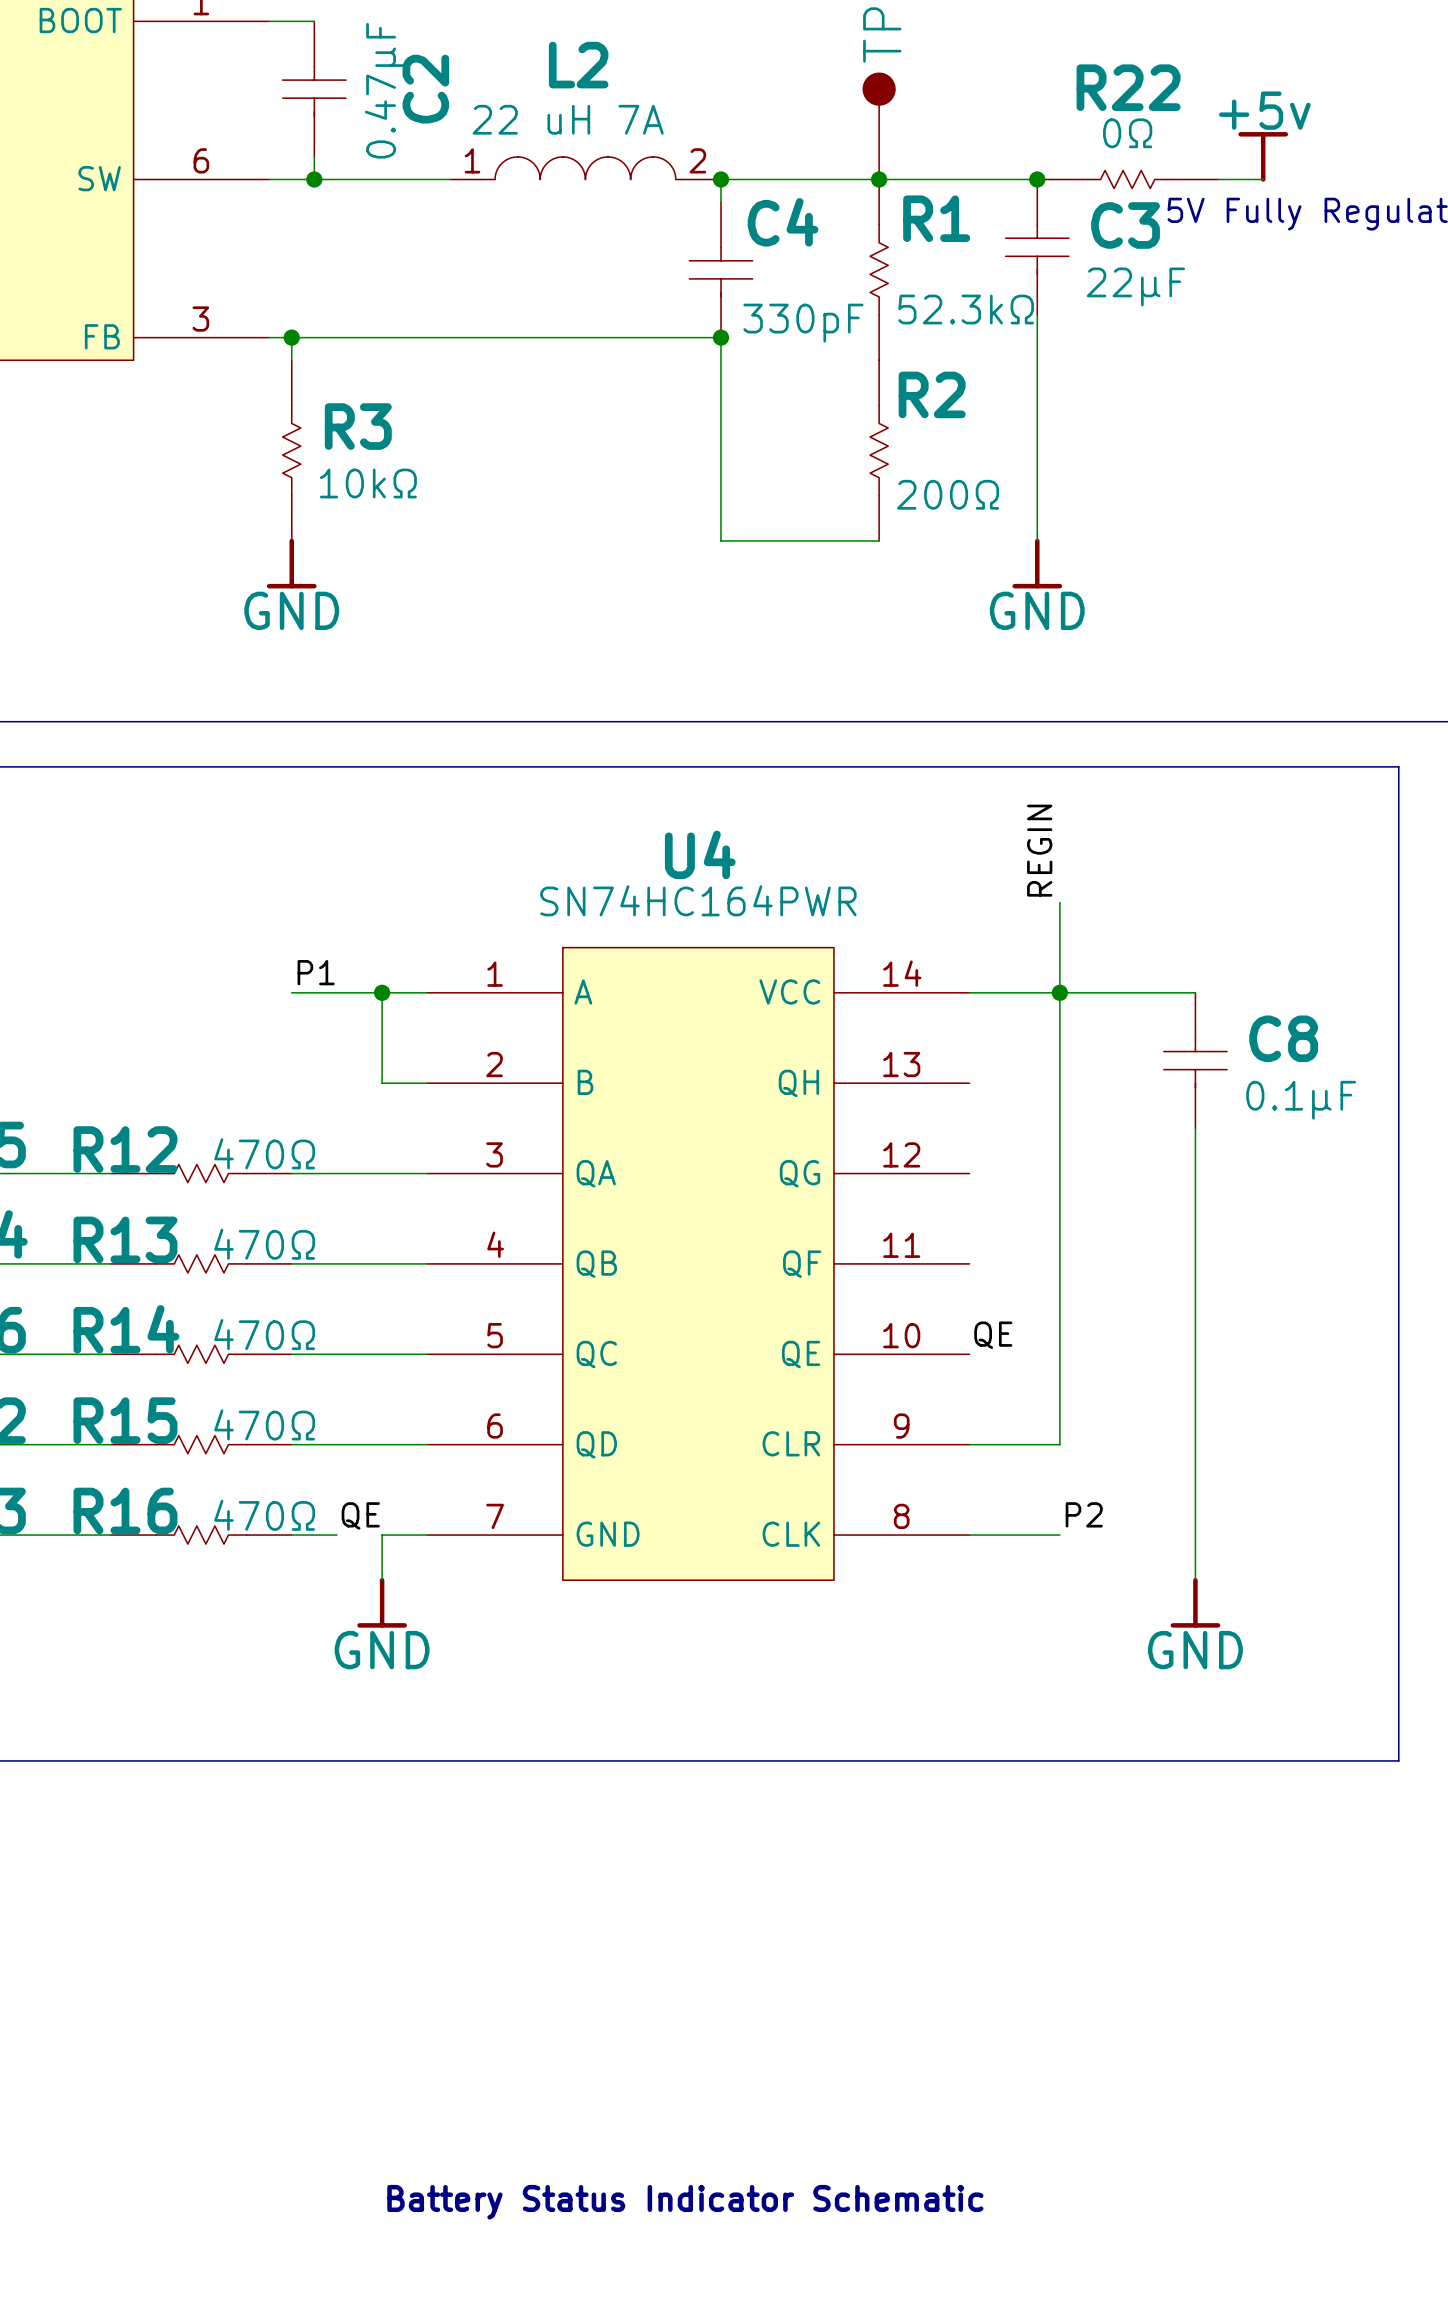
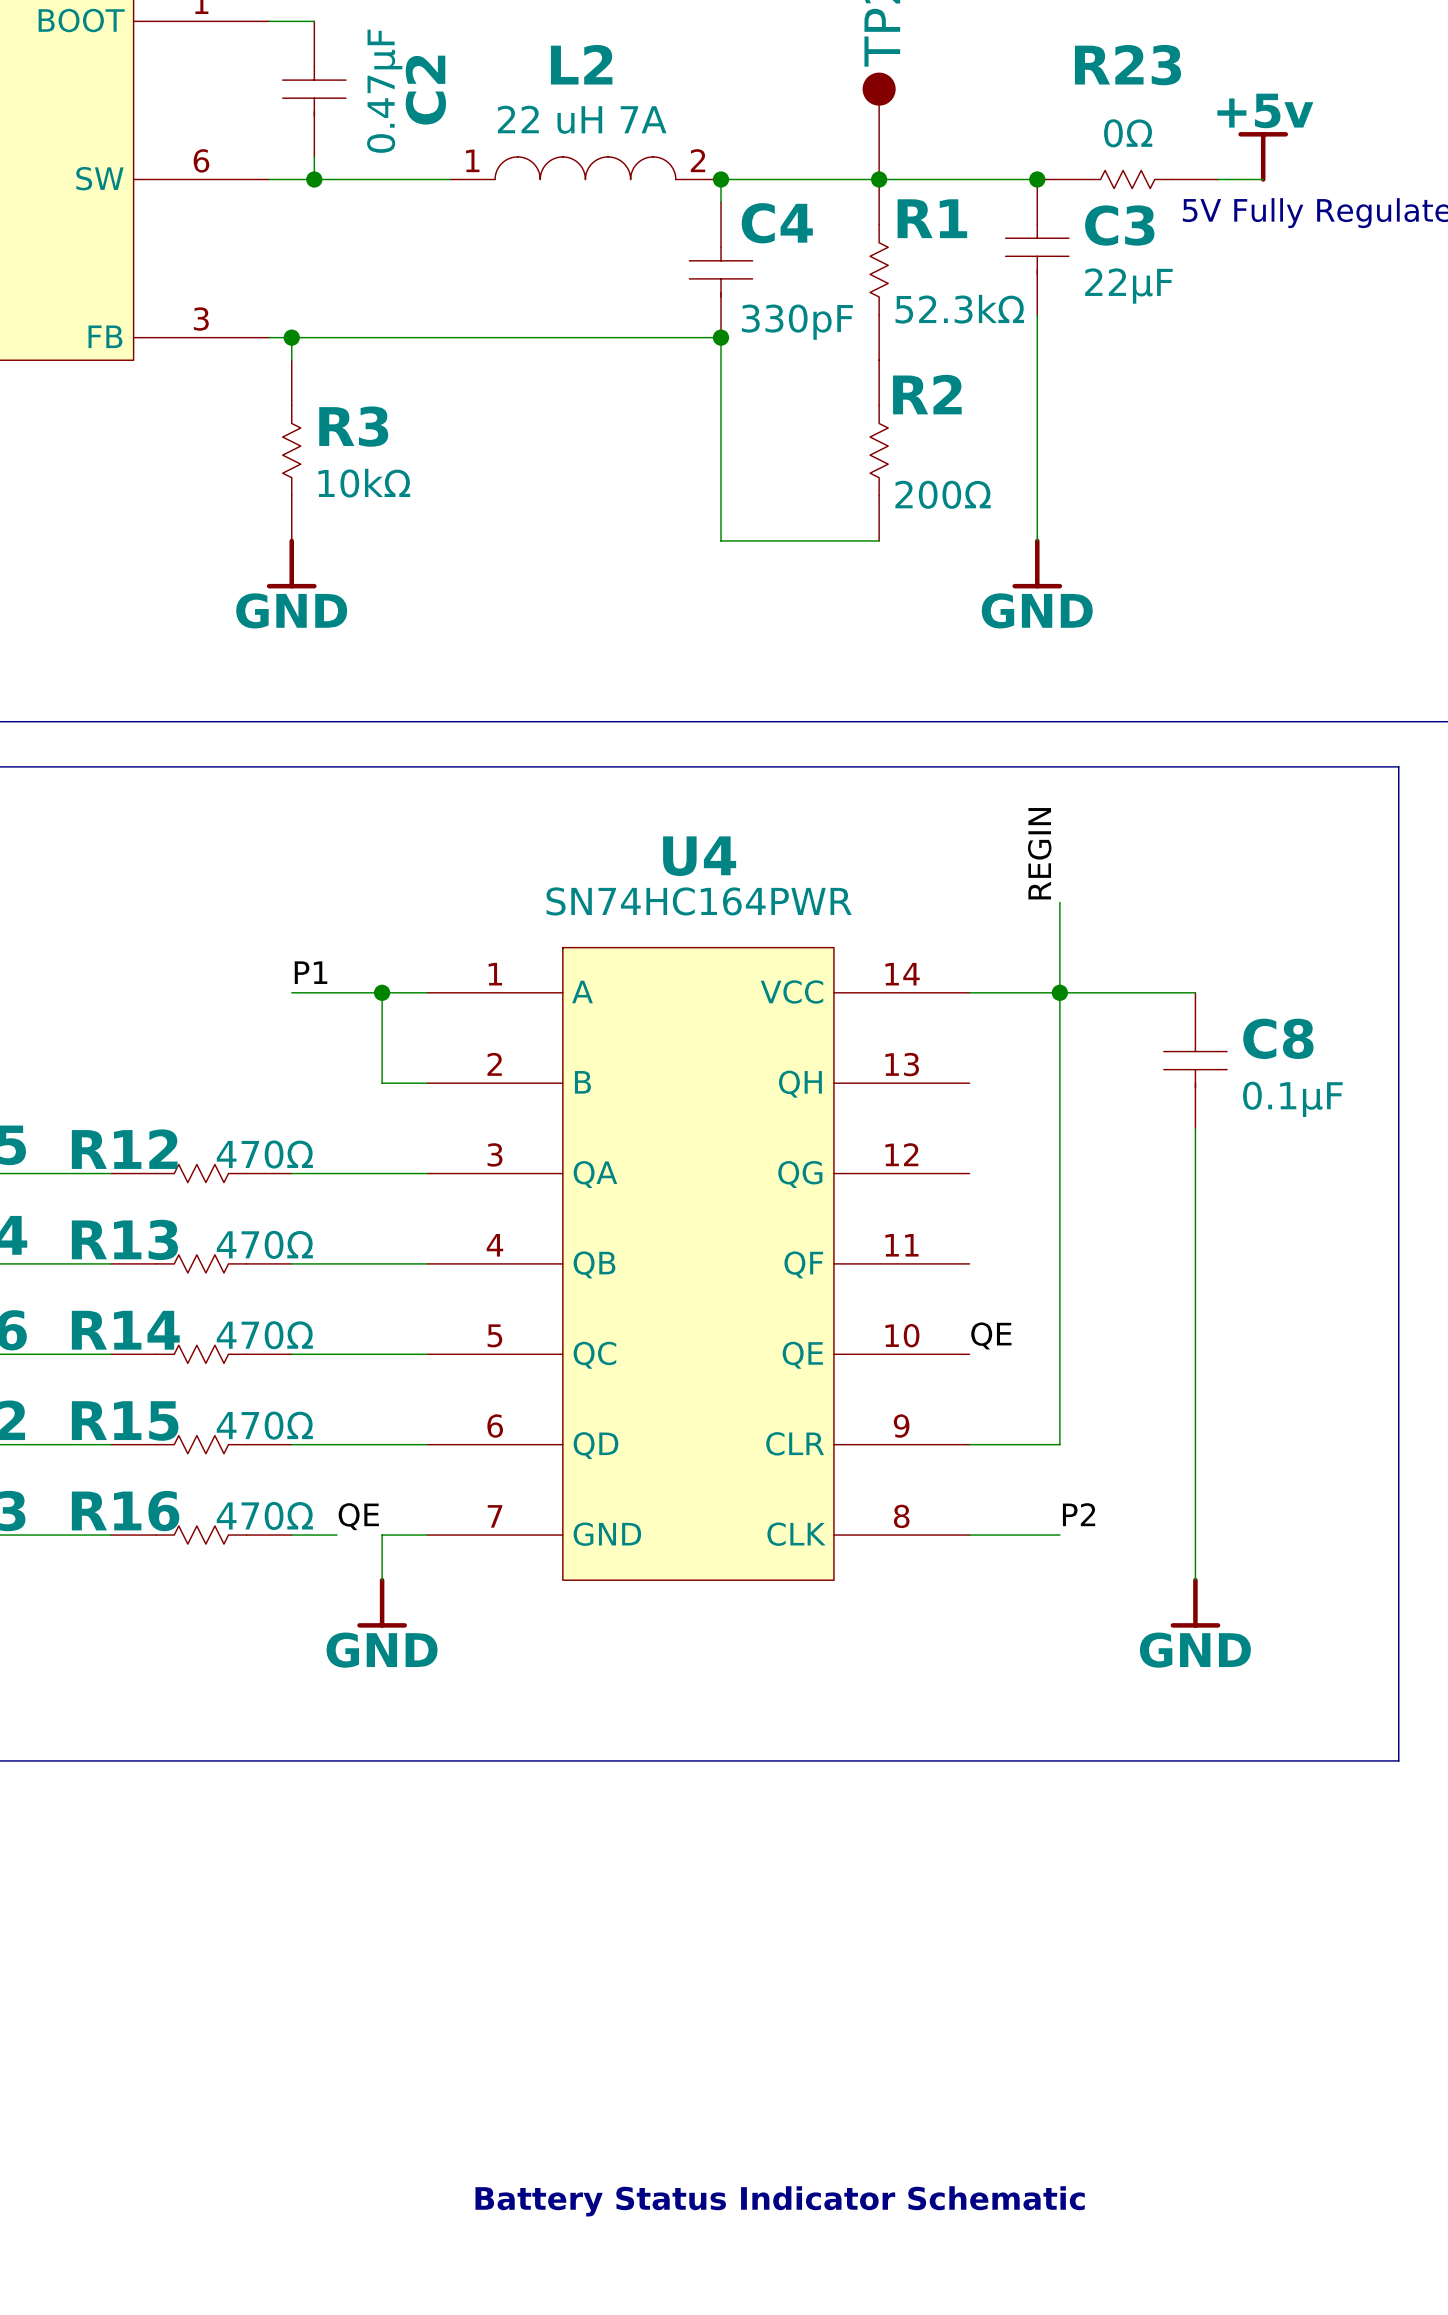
R22 name: R22 (1128, 87) -> R23 (1127, 65)
text position: Battery Status Indicator Schematic (685, 2202) -> Battery Status Indicator Schematic (780, 2201)

